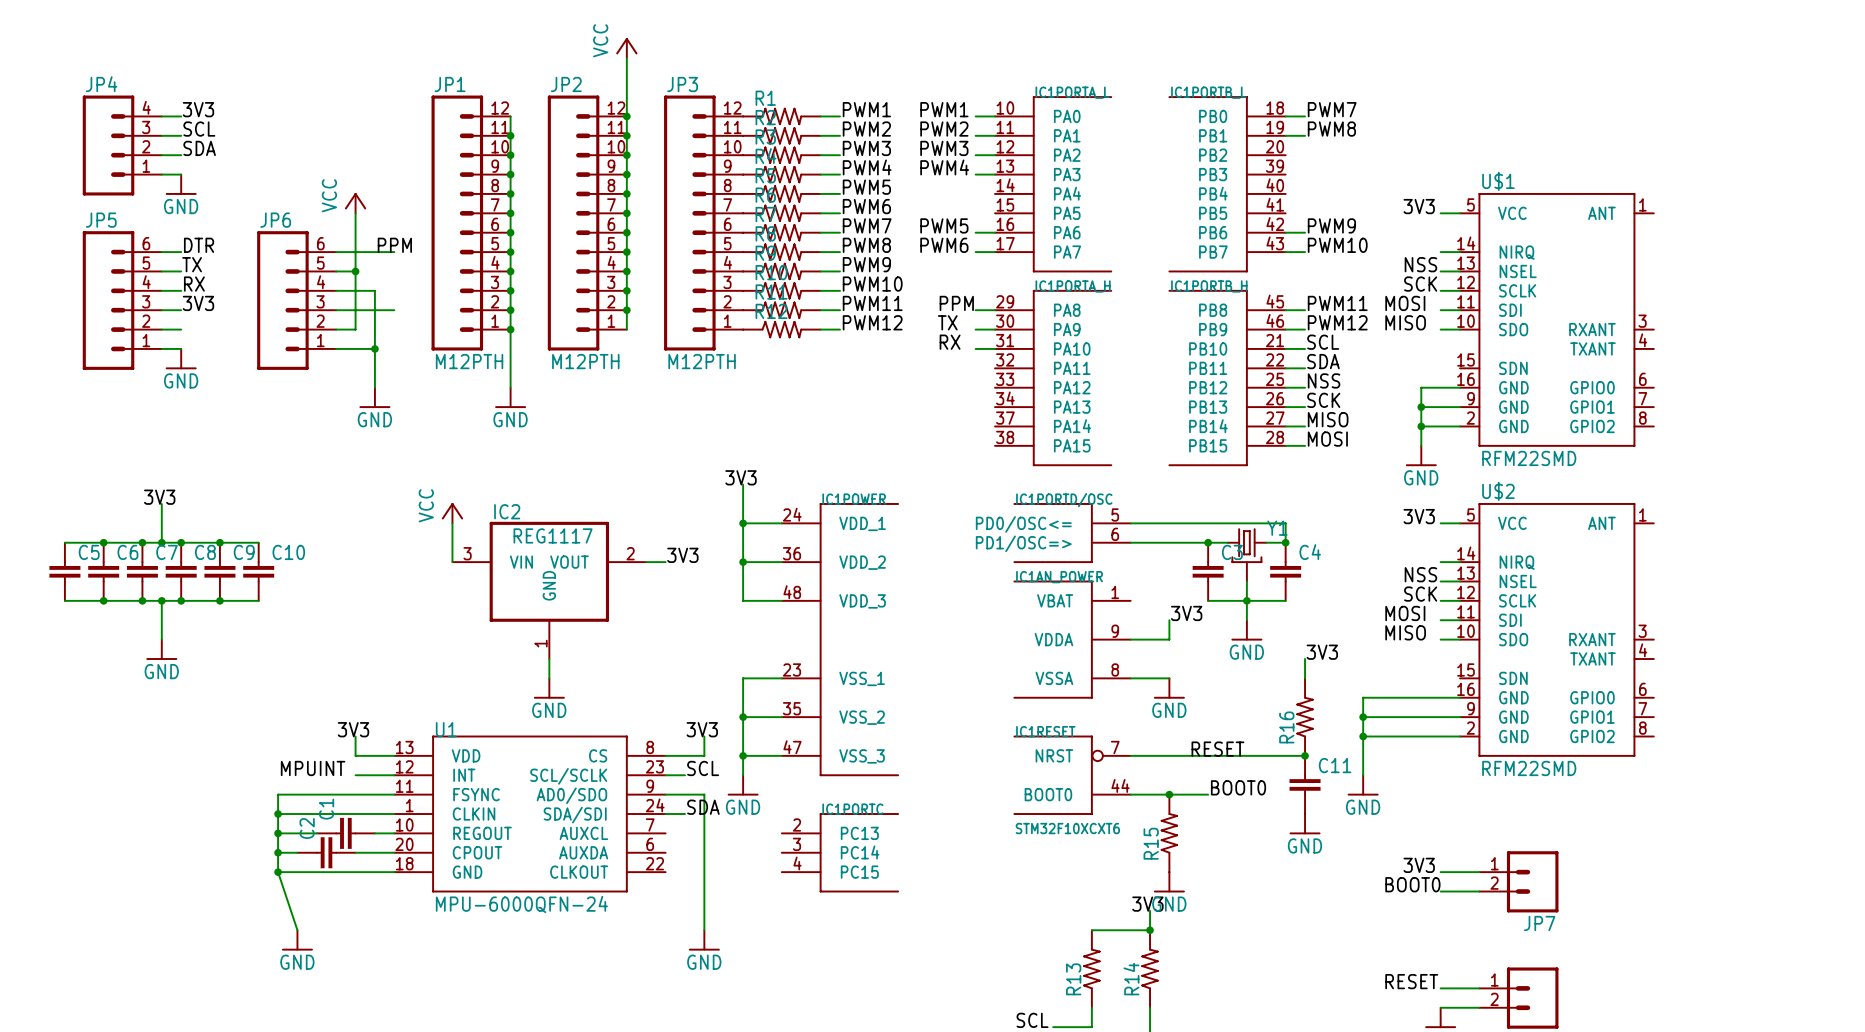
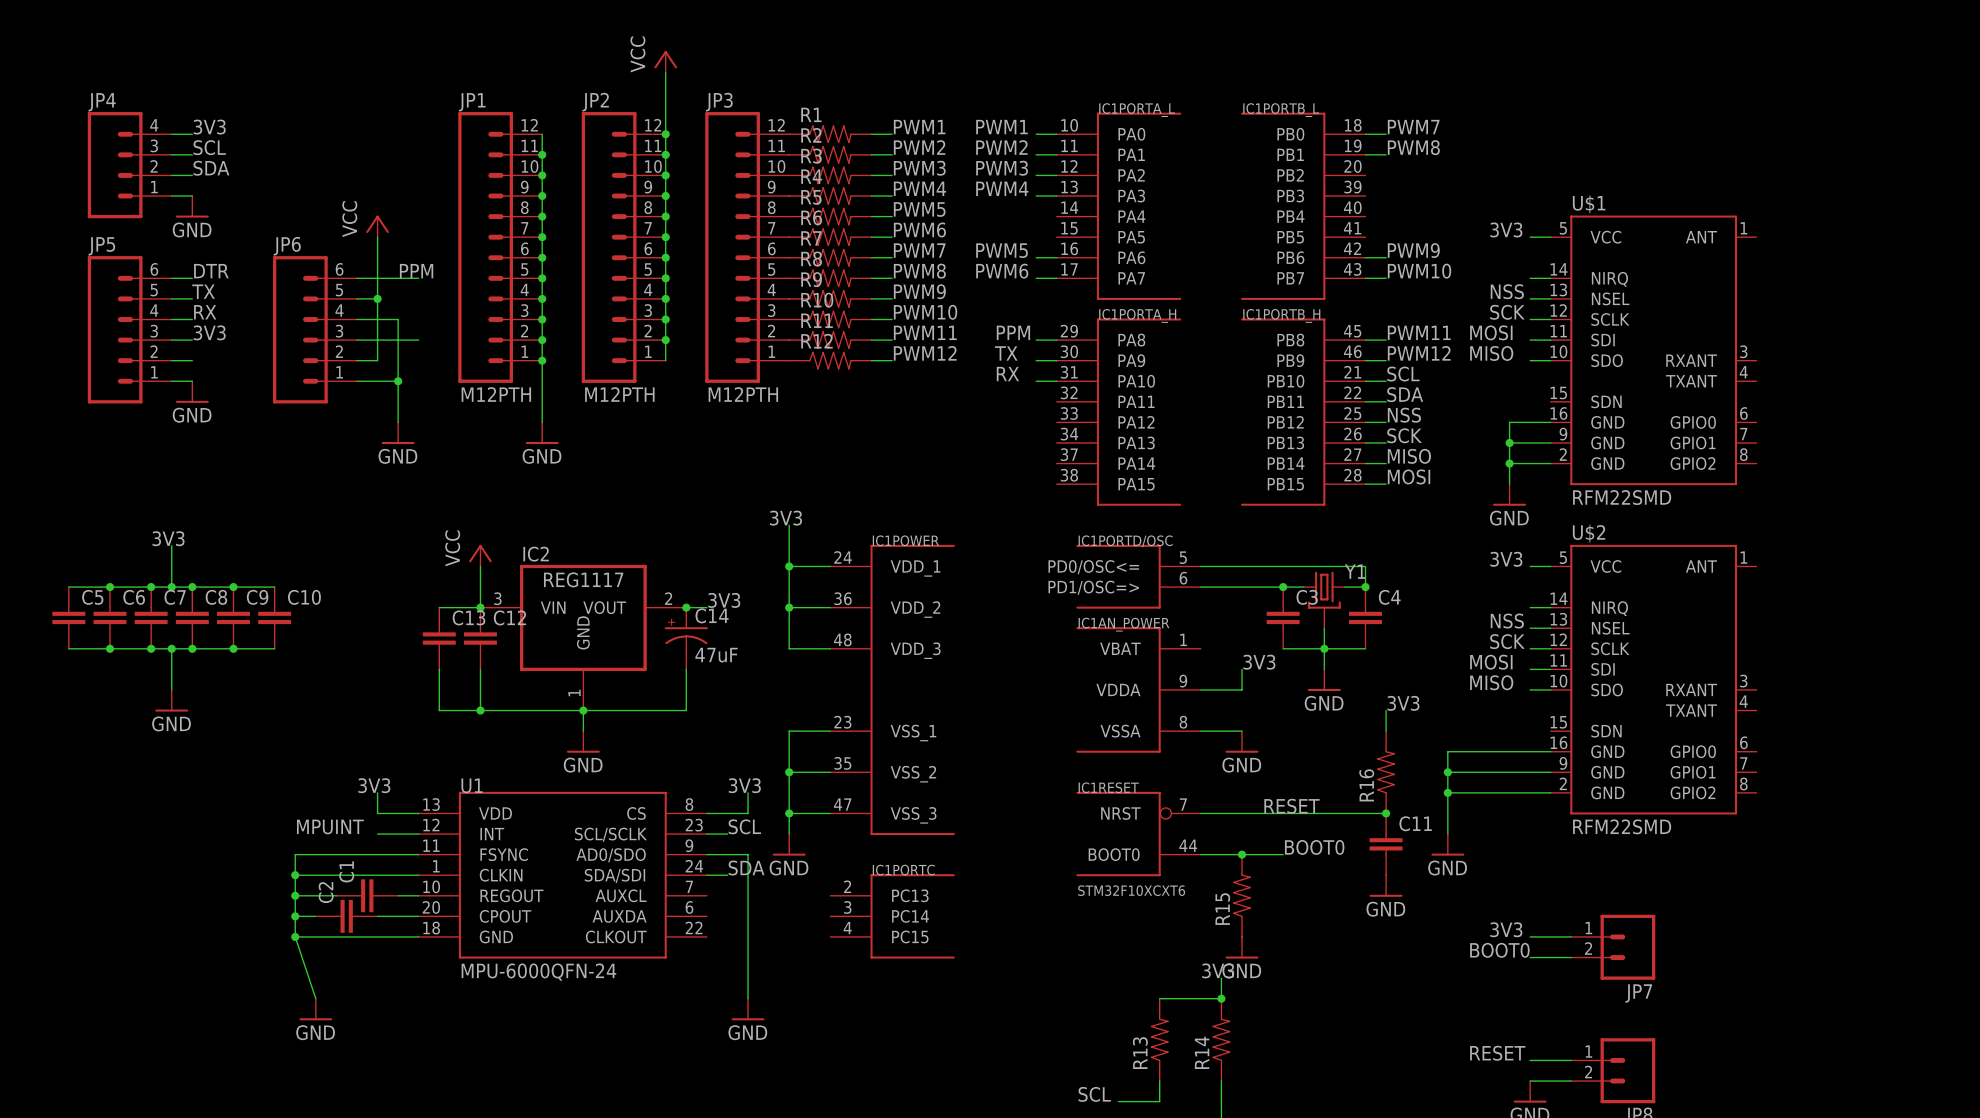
wire: none -> (439, 607) (480, 607)
junction: none -> (480, 607)
junction: none -> (686, 607)
C13: none -> (439, 638)
C12: none -> (480, 638)
C14: none -> 47uF (686, 638)
wire: none -> (439, 669) (439, 710) (686, 710) (686, 669)
wire: none -> (480, 669) (480, 710)
junction: none -> (480, 710)
junction: none -> (583, 710)

